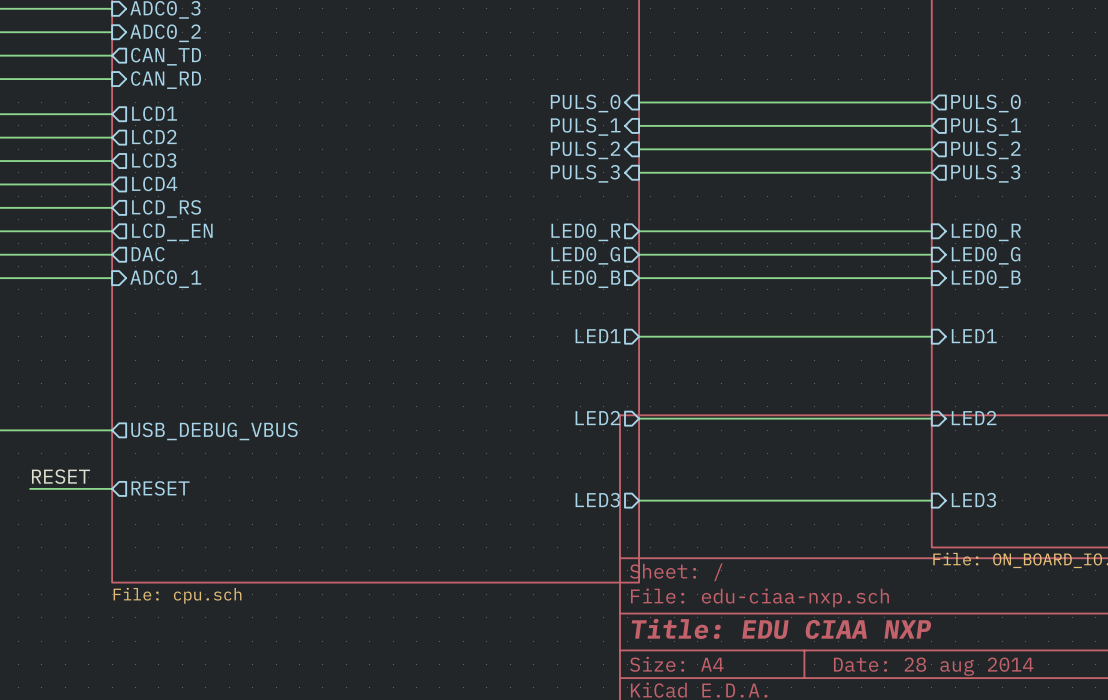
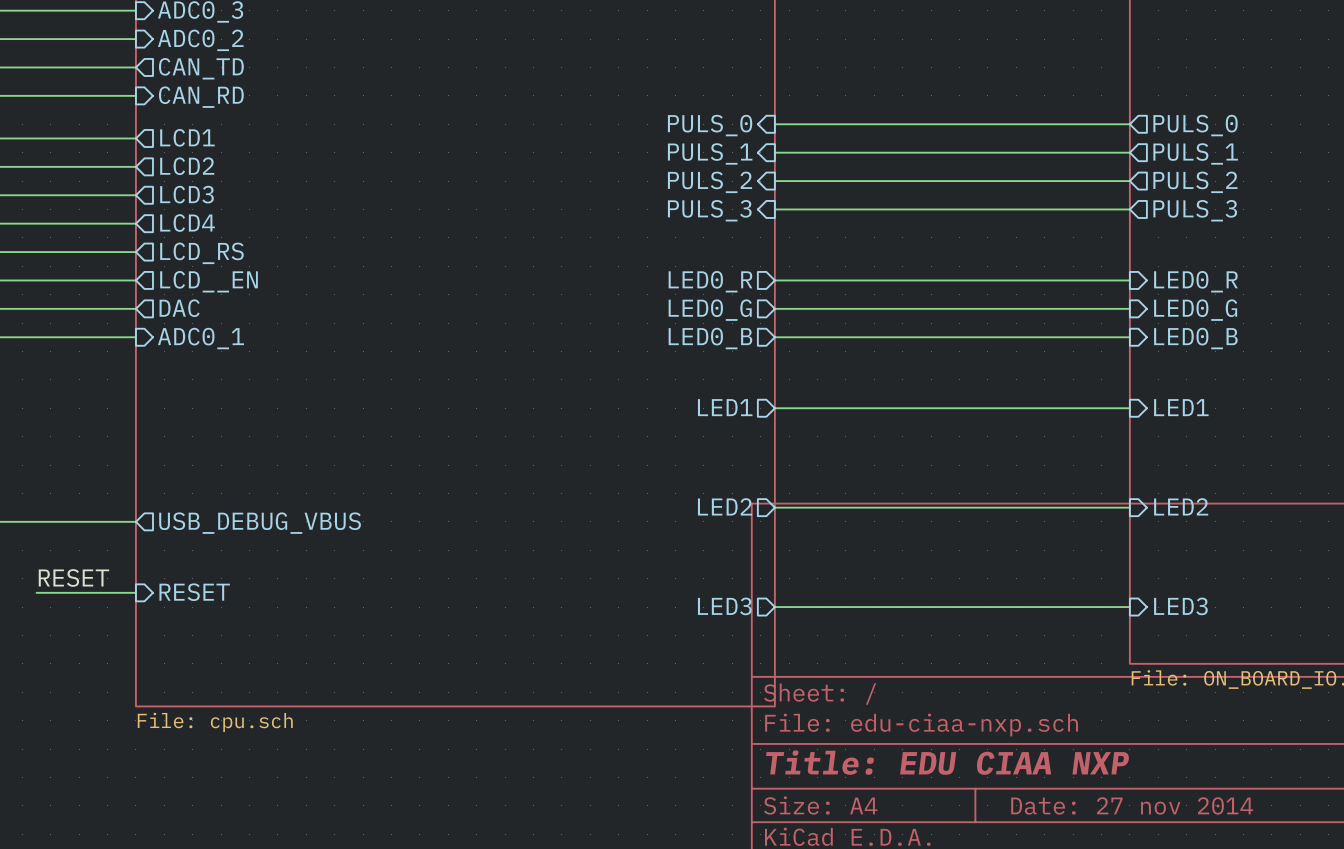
sheet pin shape: output (160, 488) -> input (194, 592)
title block: Date: 28 aug 2014 (933, 666) -> Date: 27 nov 2014 (1132, 805)

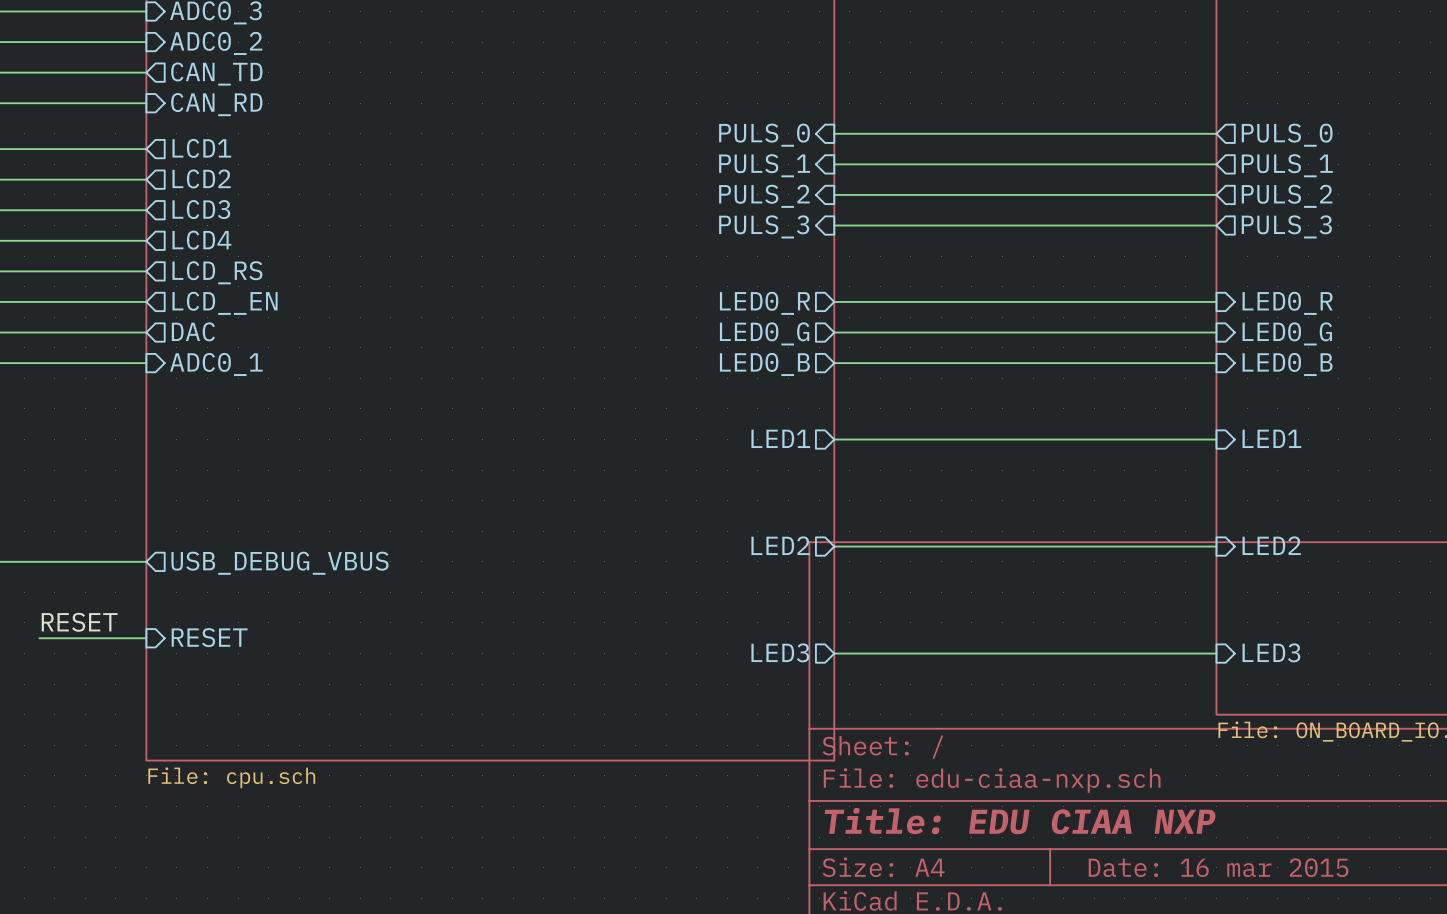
title block: Date: 27 nov 2014 (1132, 805) -> Date: 16 mar 2015 (1218, 867)

